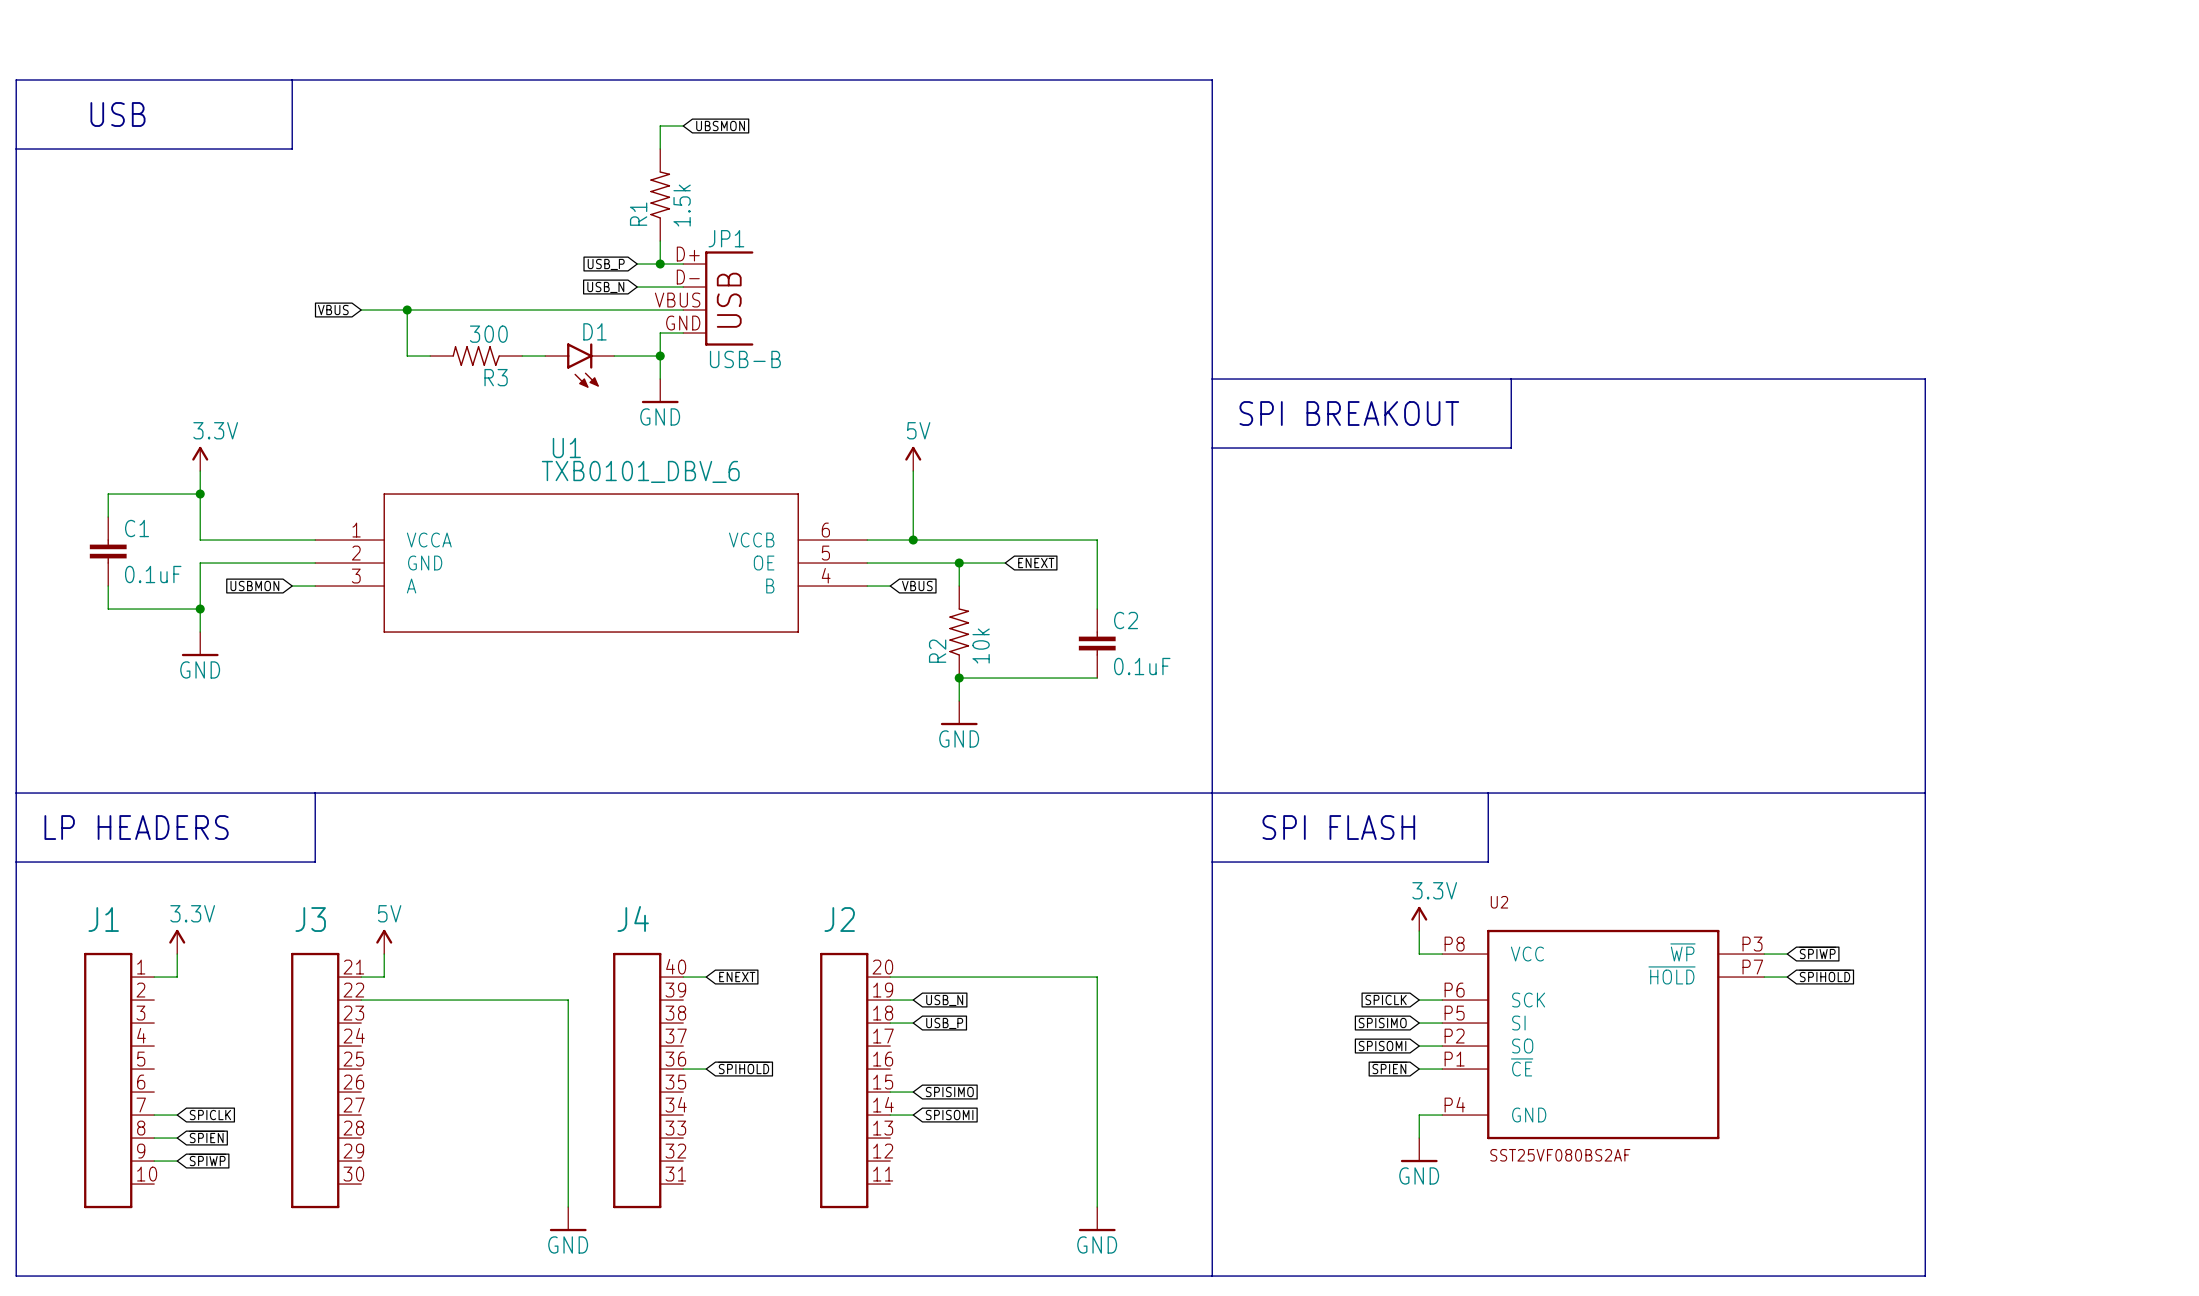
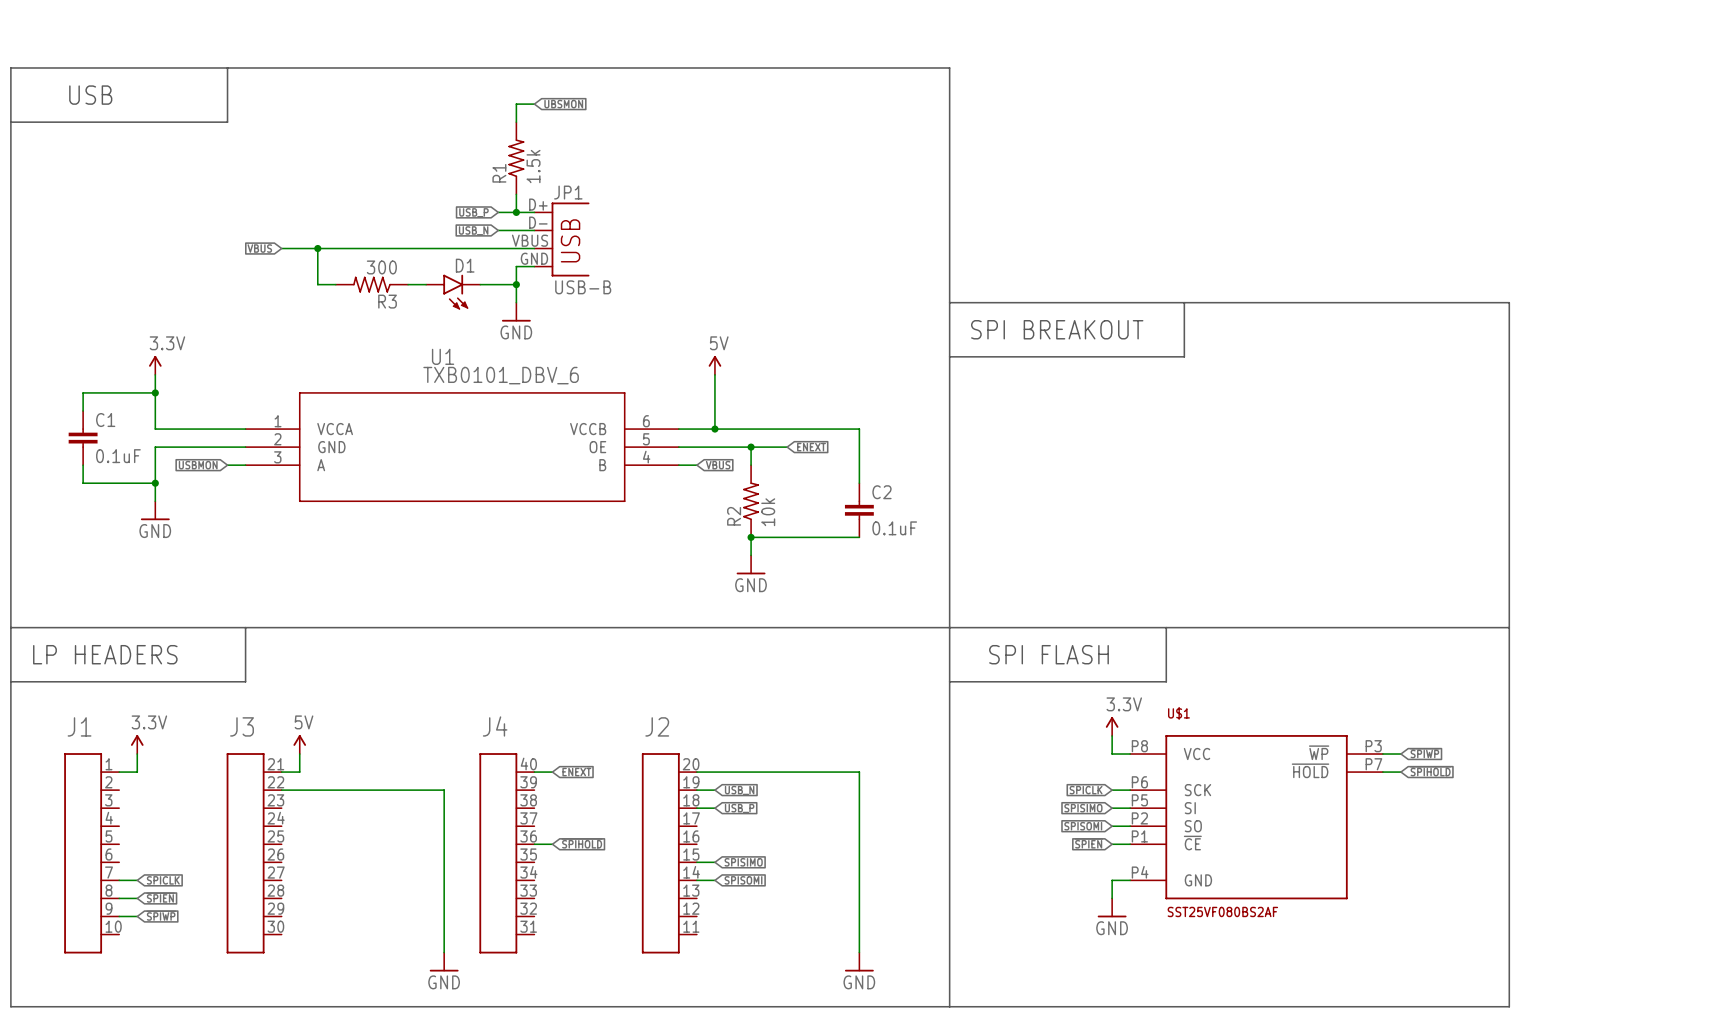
U2 name: U2 (1499, 902) -> U$1 (1178, 713)

